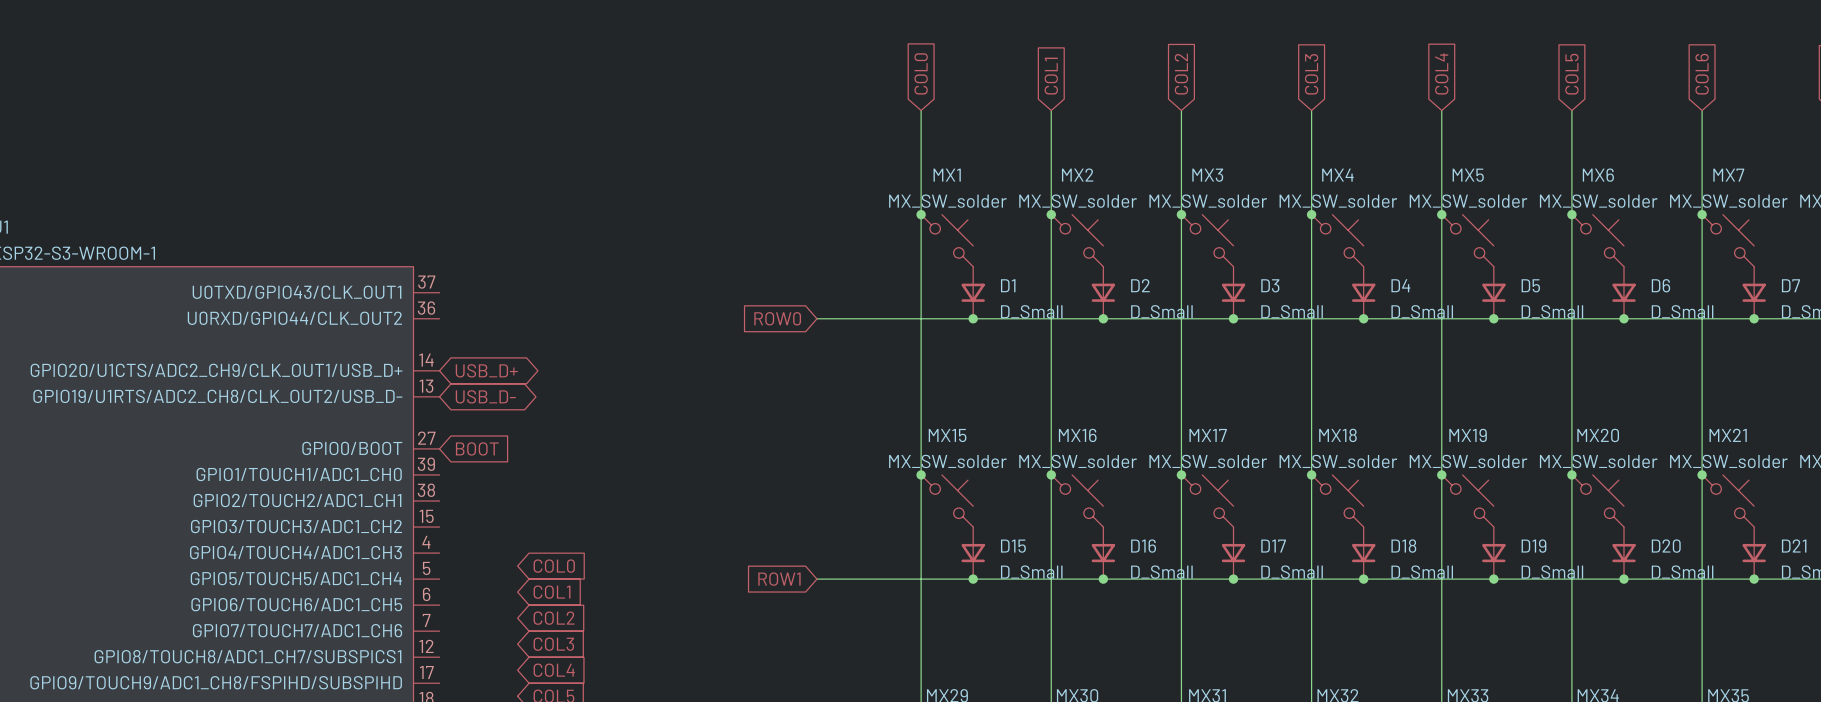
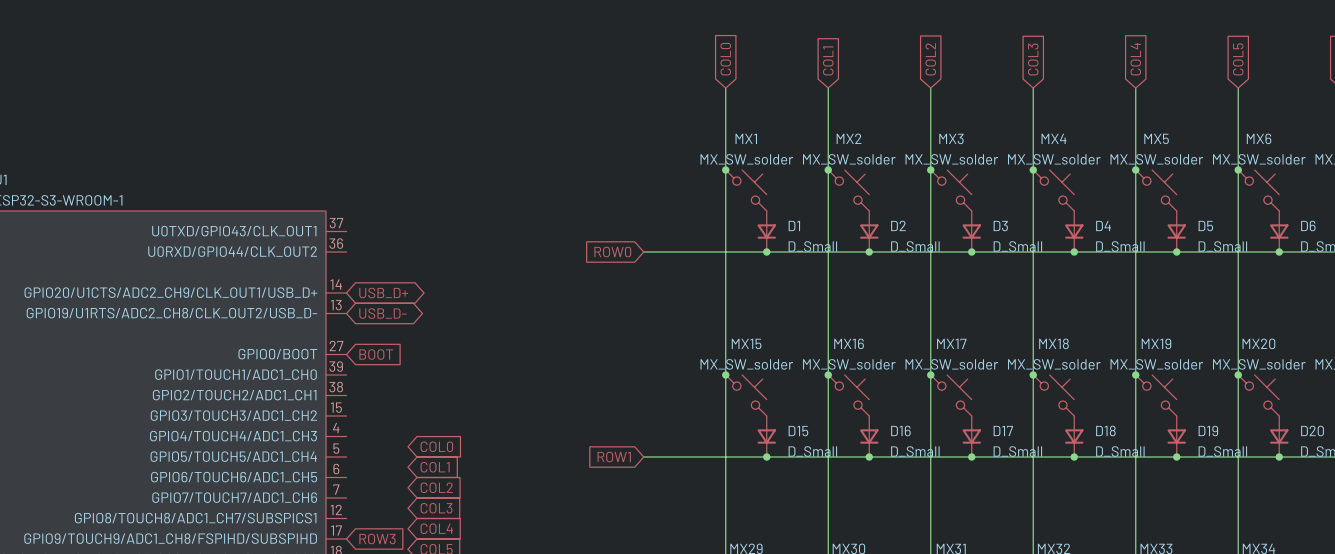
global label: none -> ROW3 (377, 539)

